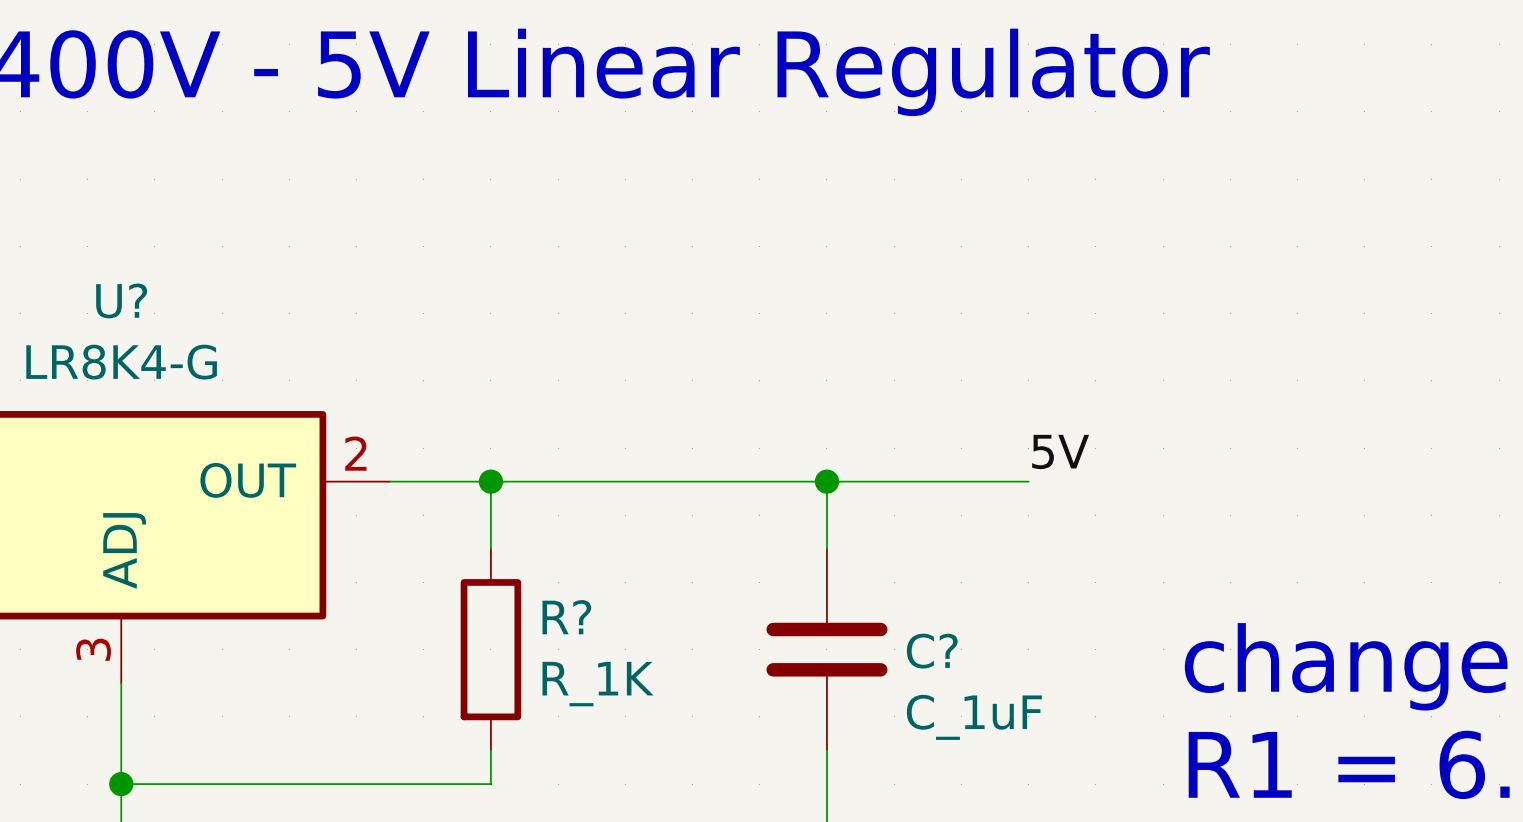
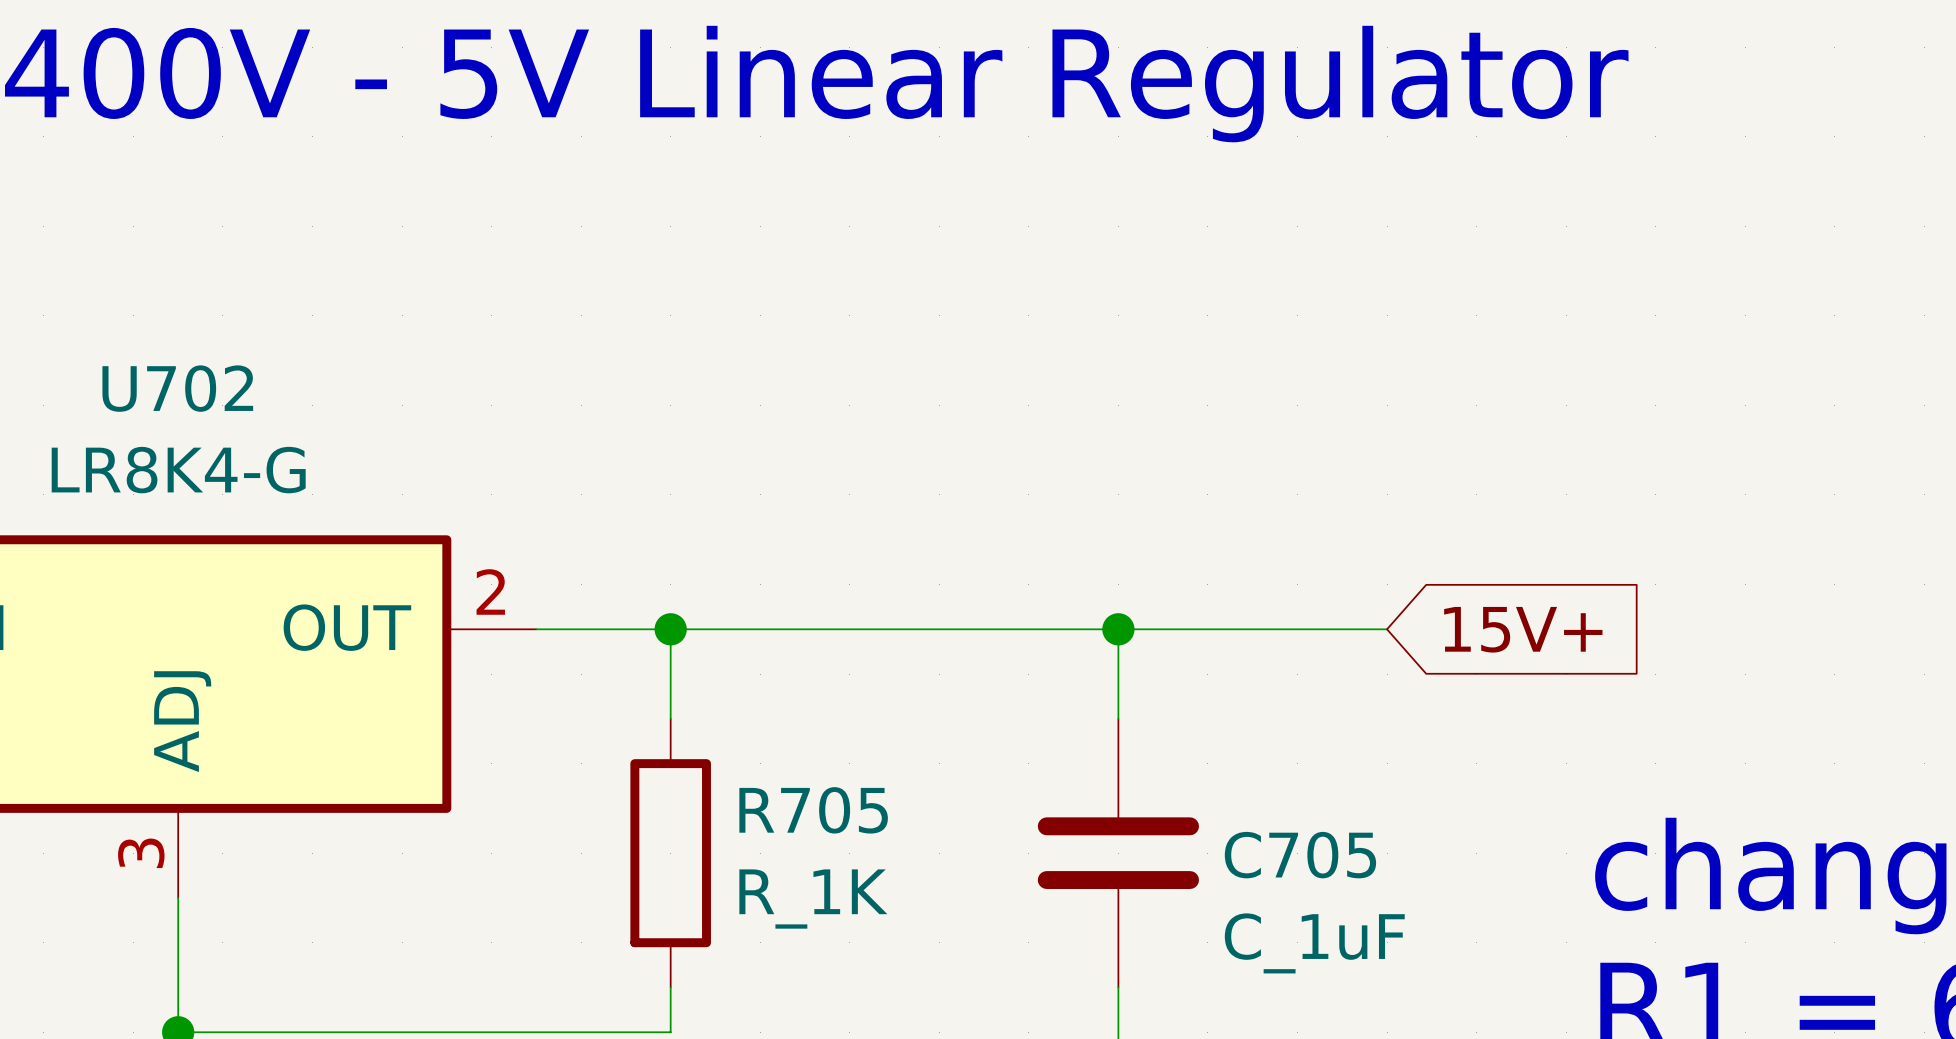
U? name: U? (121, 300) -> U702 (177, 388)
label: 5V (1060, 451) -> none
global label: none -> 15V+ (1523, 629)
R? name: R? (566, 617) -> R705 (813, 810)
C? name: C? (932, 651) -> C705 (1300, 855)

